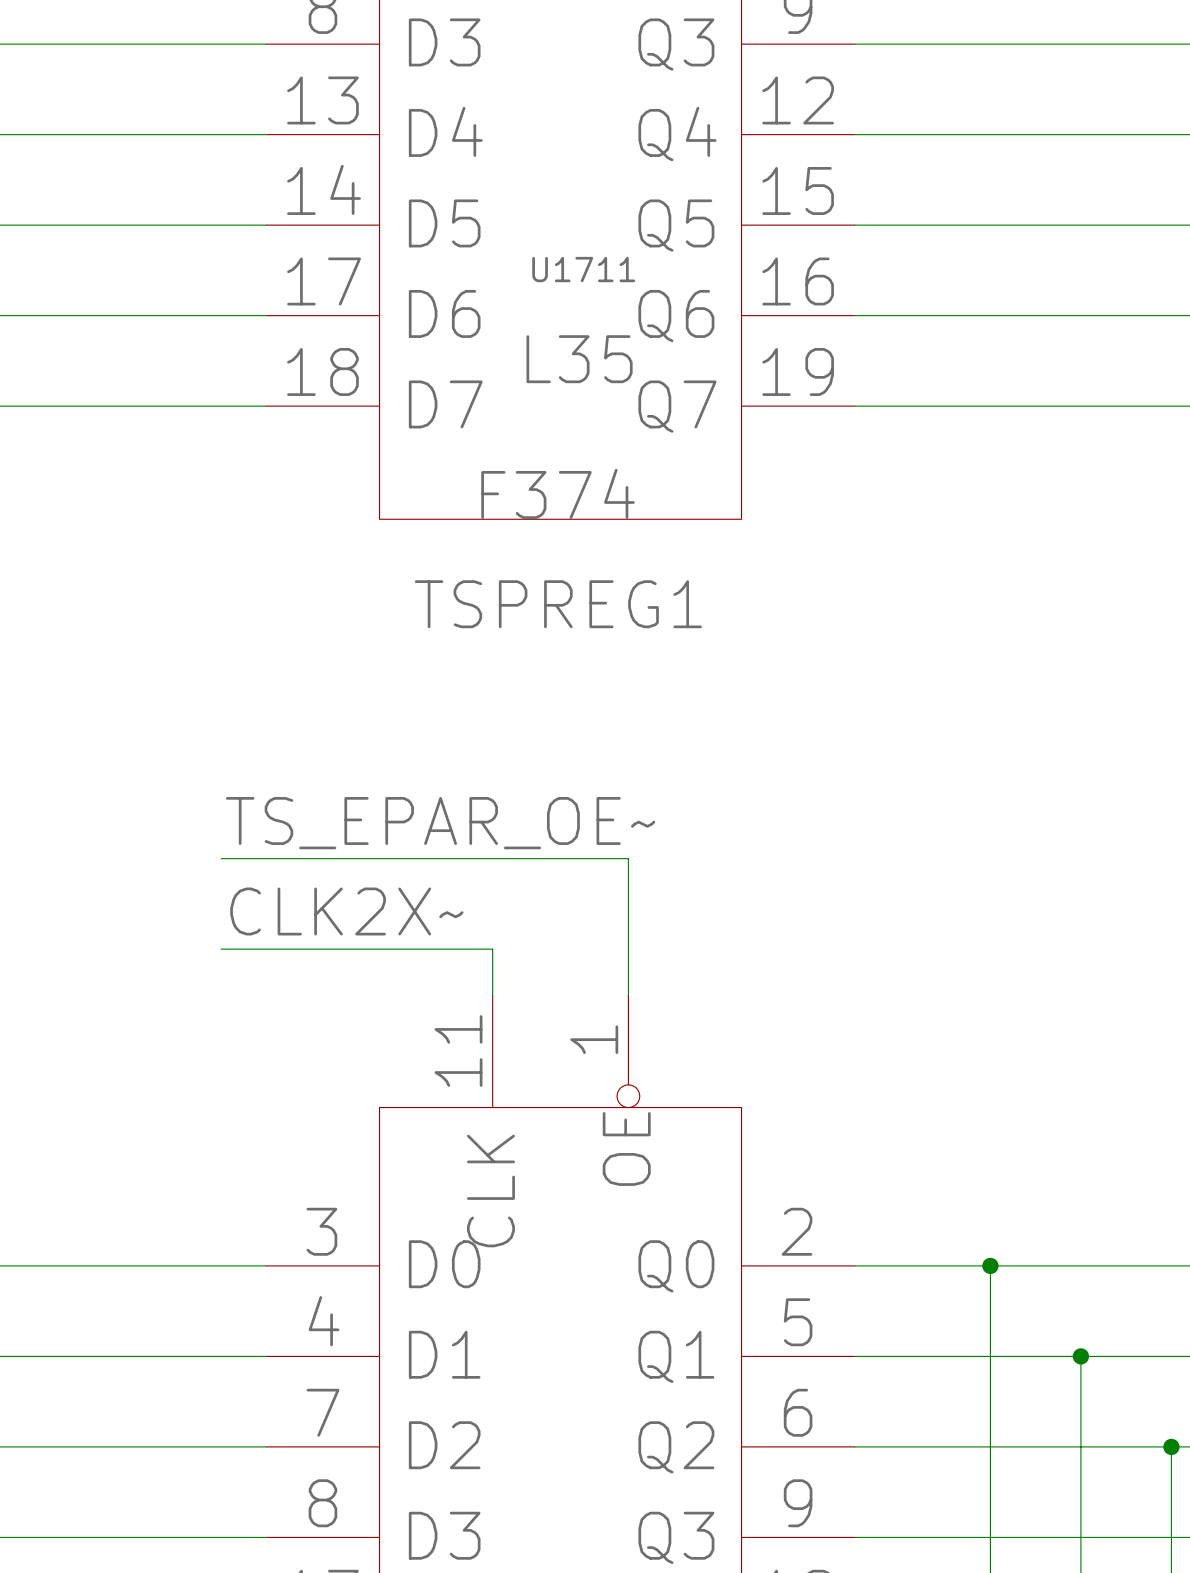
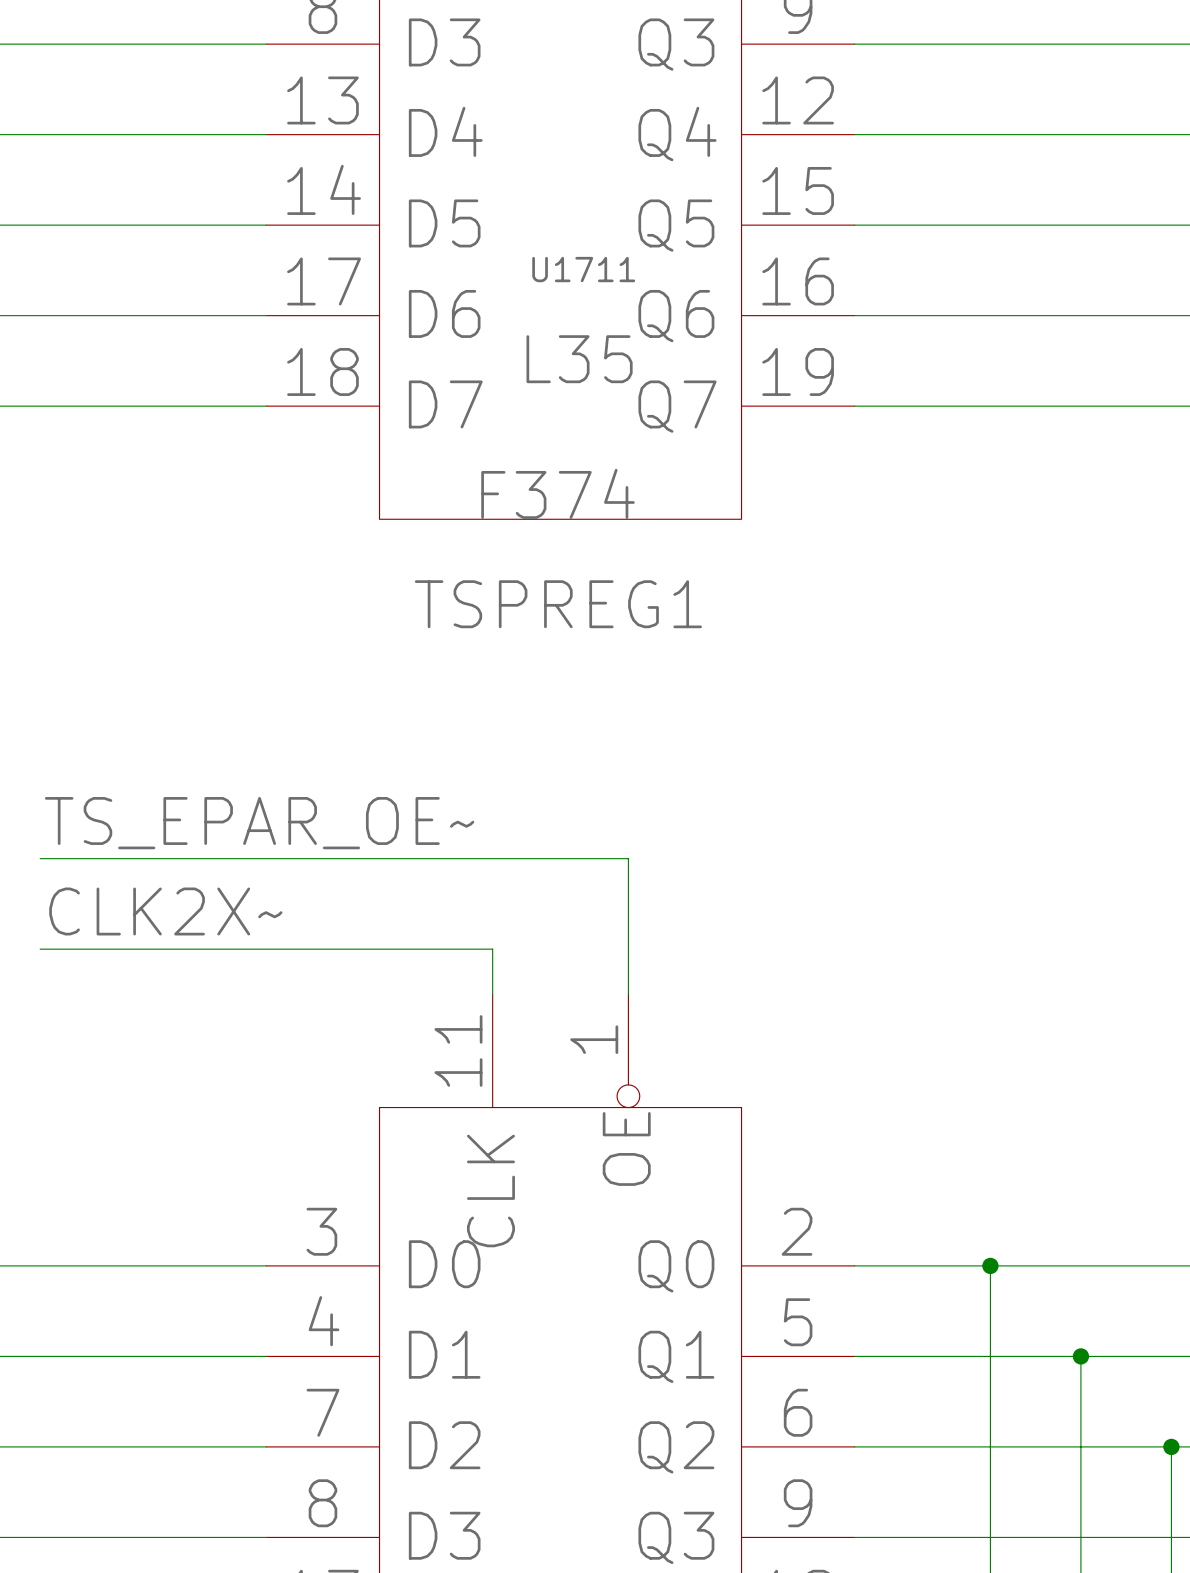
label position: TS_EPAR_OE~ (440, 823) -> TS_EPAR_OE~ (259, 823)
wire: none -> (40, 858) (221, 858)
label position: CLK2X~ (346, 911) -> CLK2X~ (165, 911)
wire: none -> (40, 949) (221, 949)

